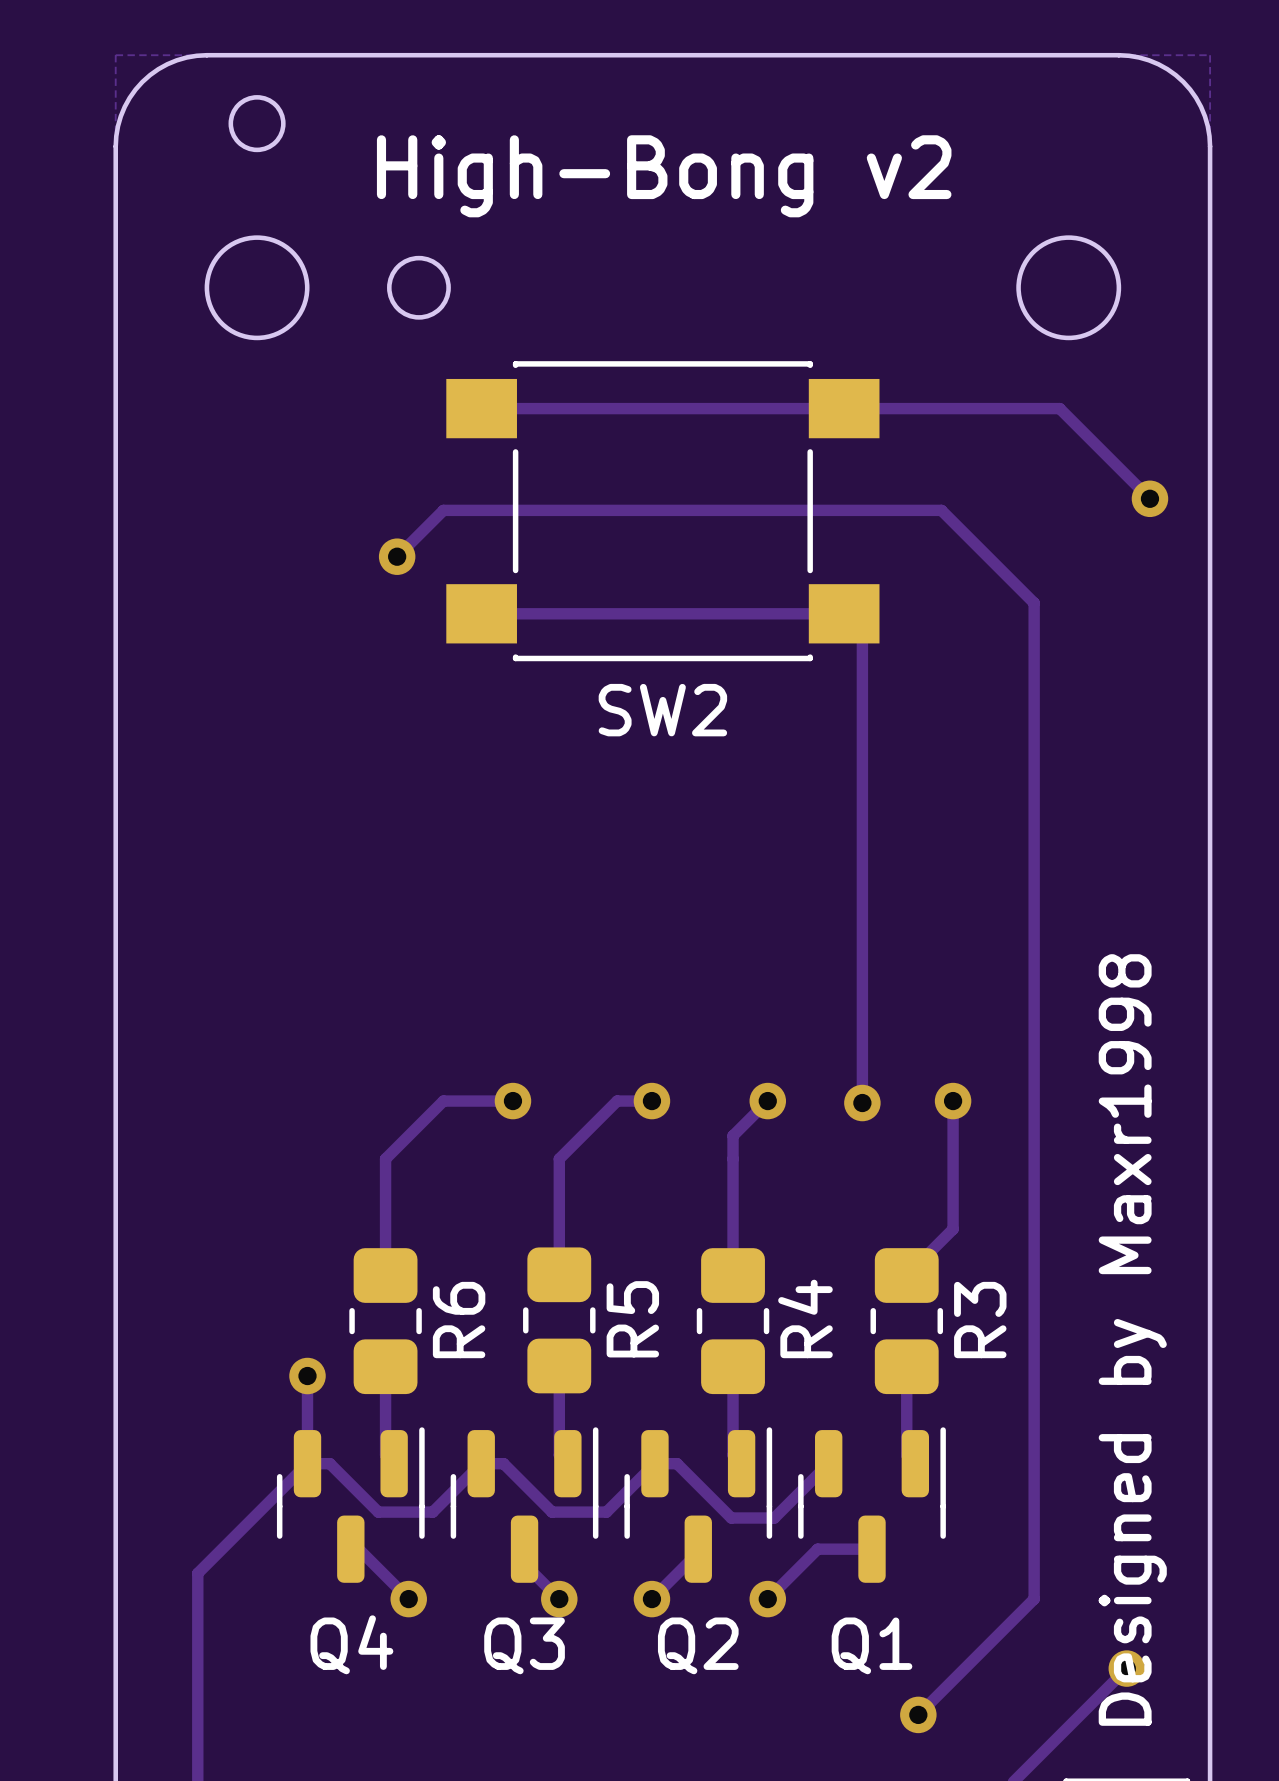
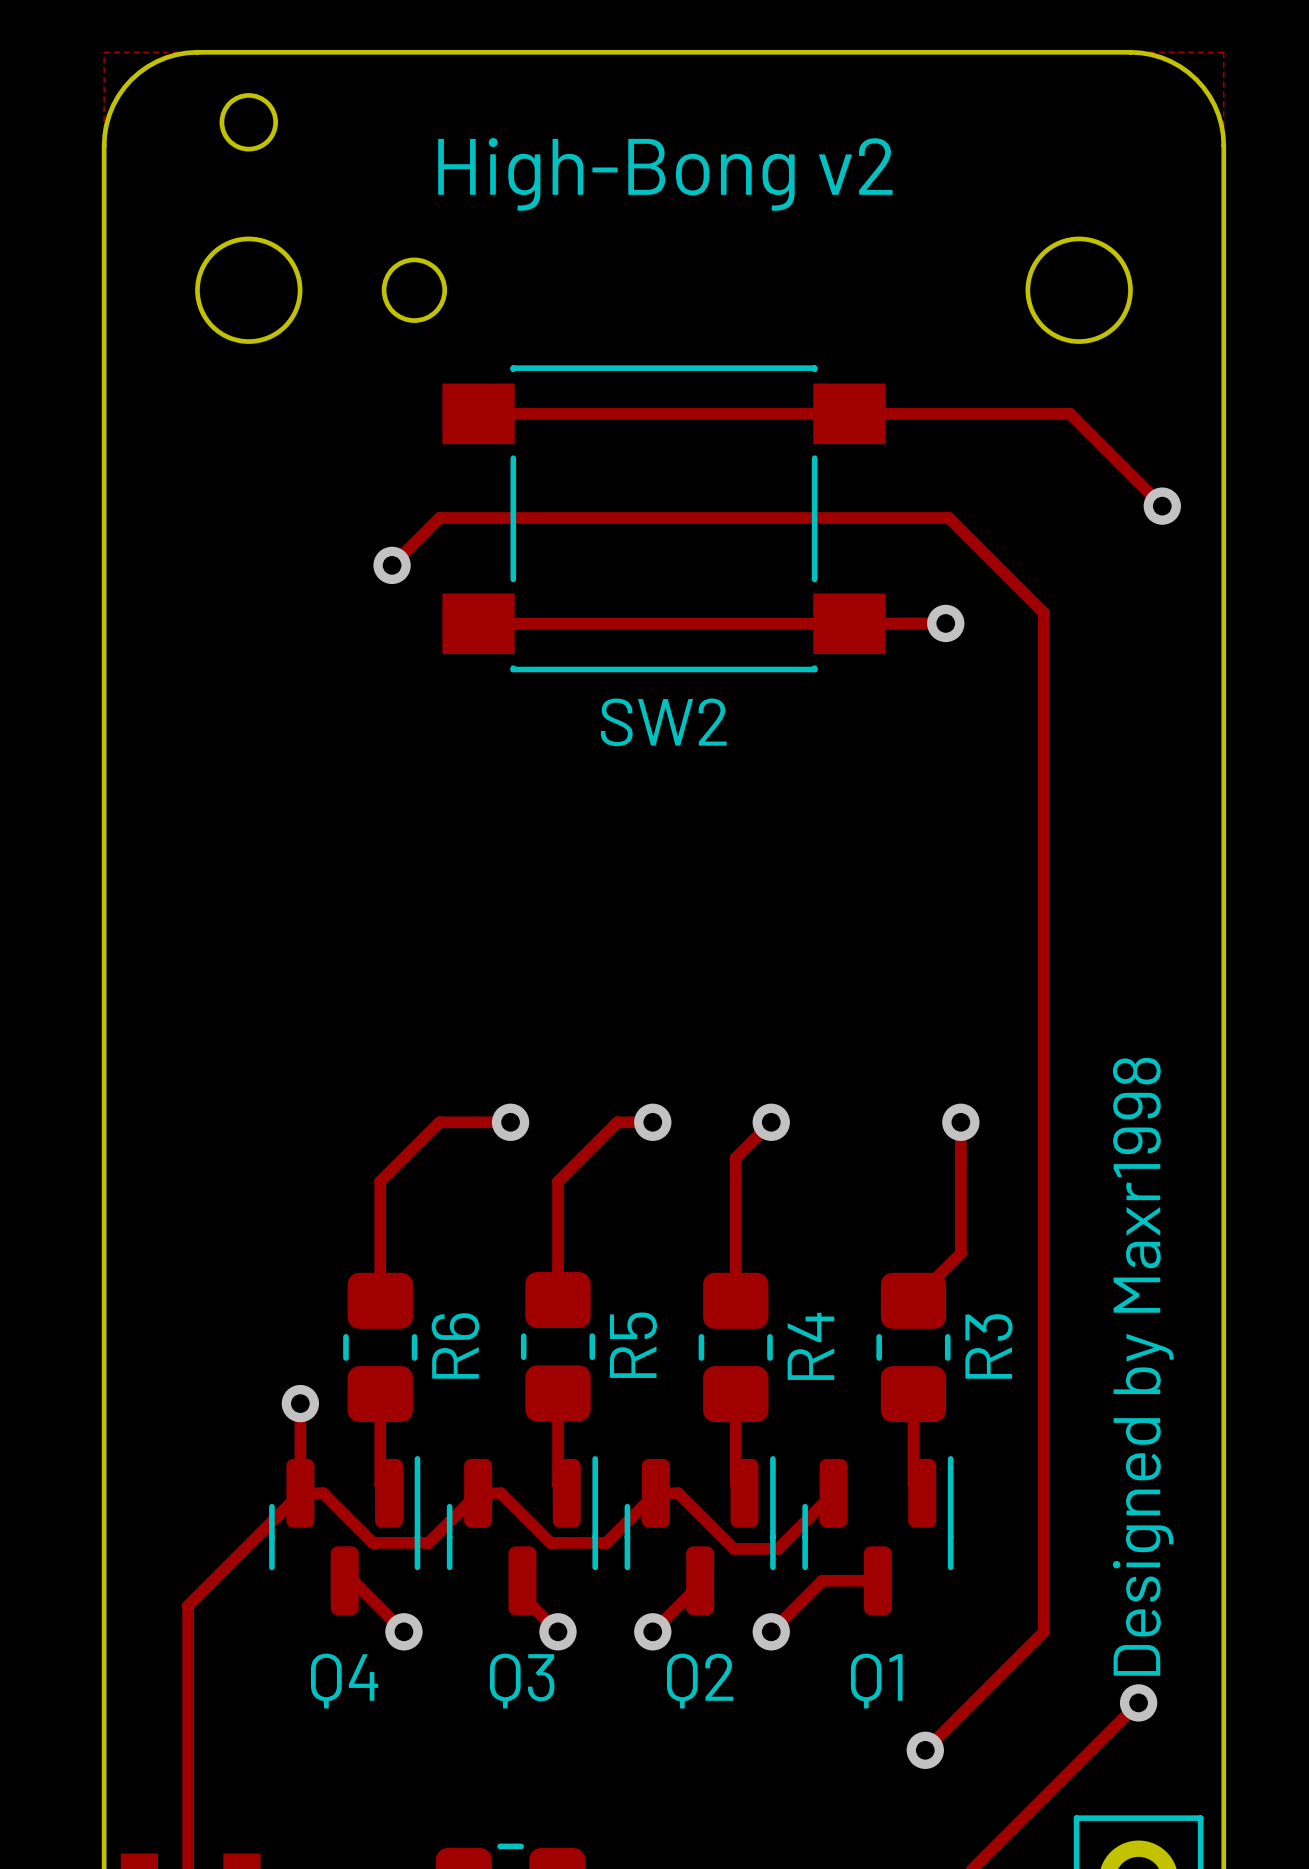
track: (844, 613) (862, 632) (862, 1103) -> (849, 623) (945, 623)
via: none -> (945, 623)
via: (862, 1103) -> none

